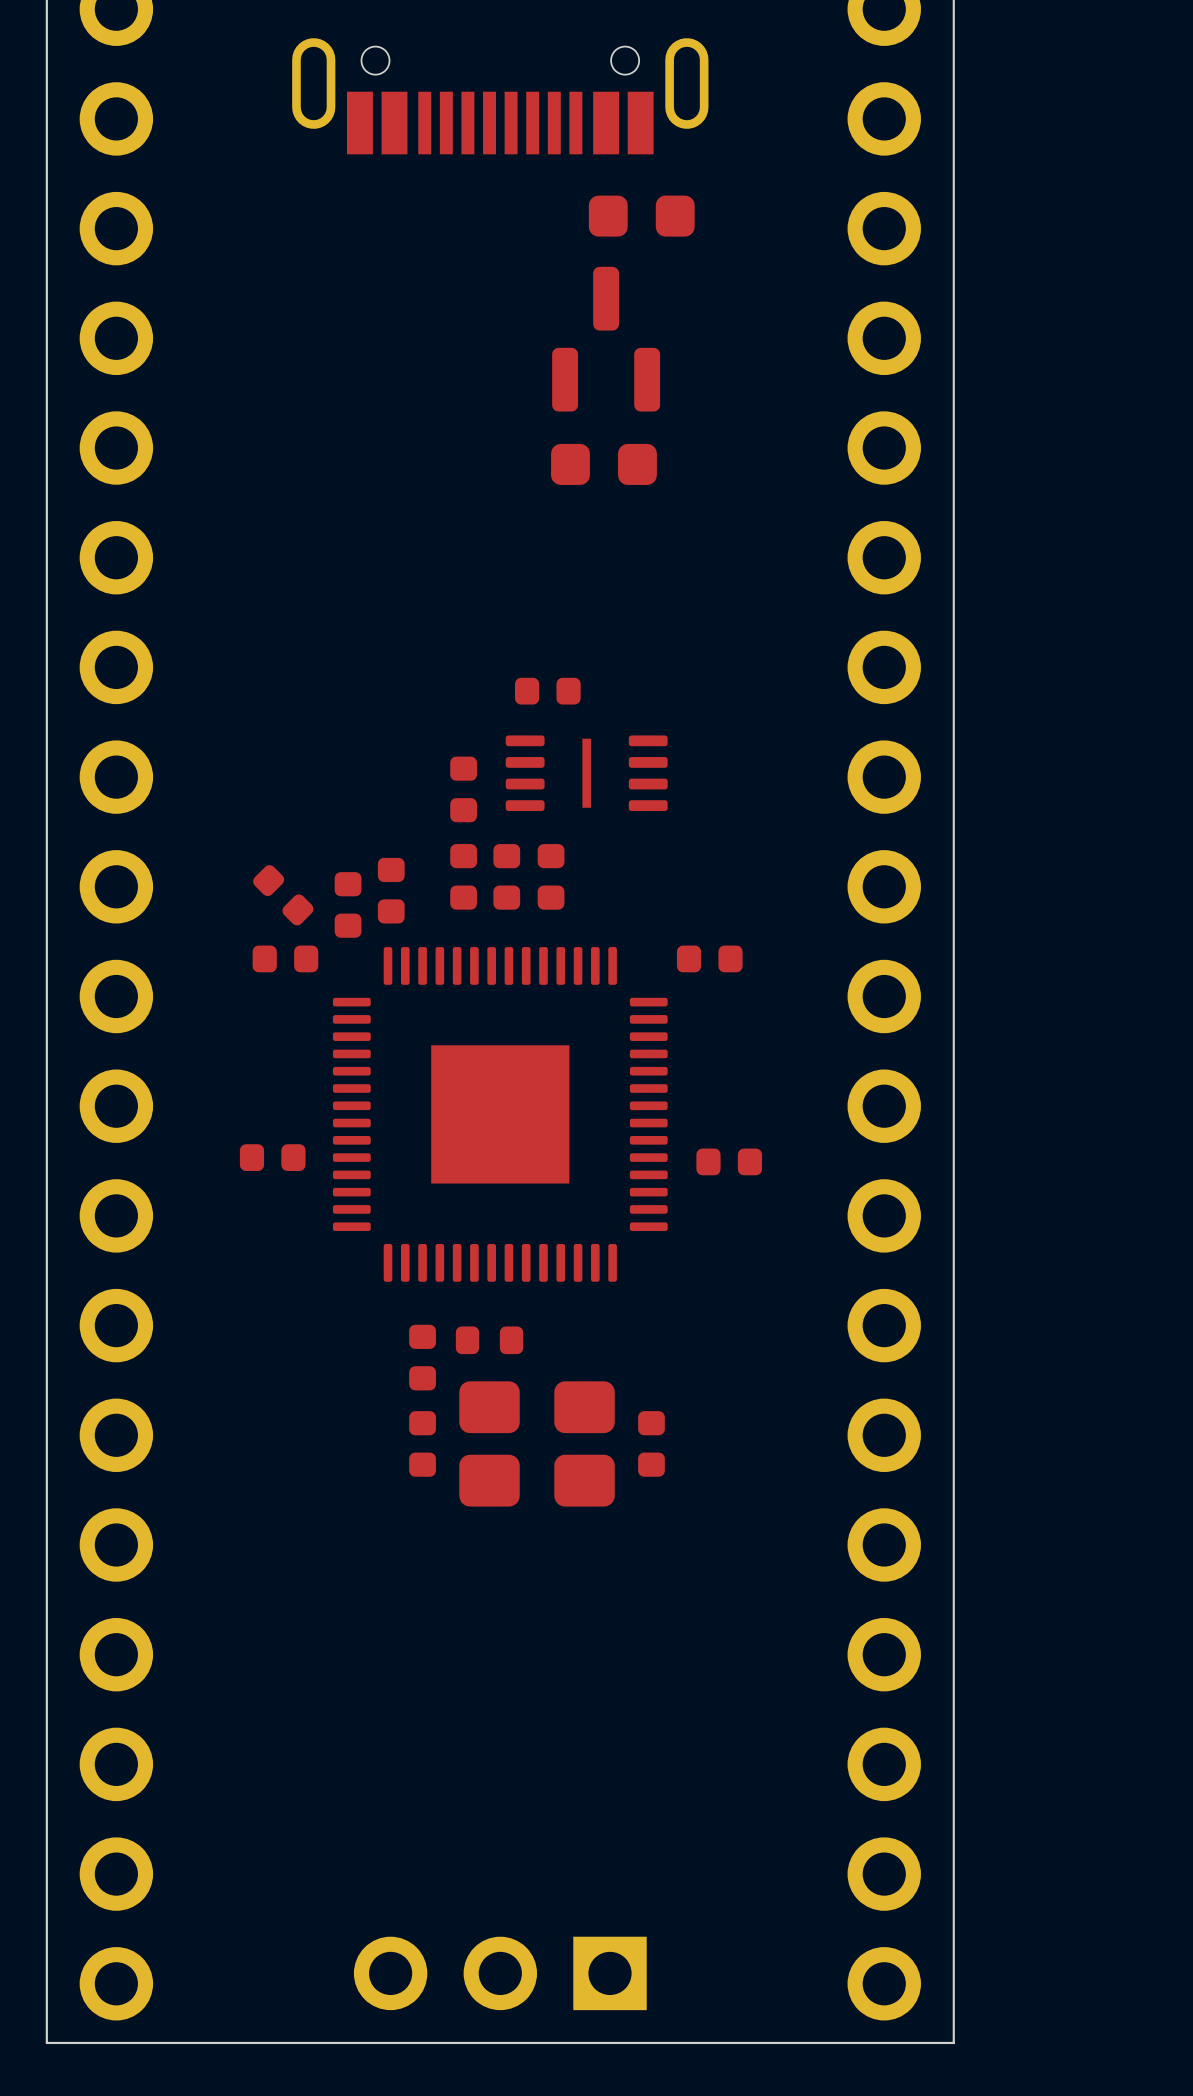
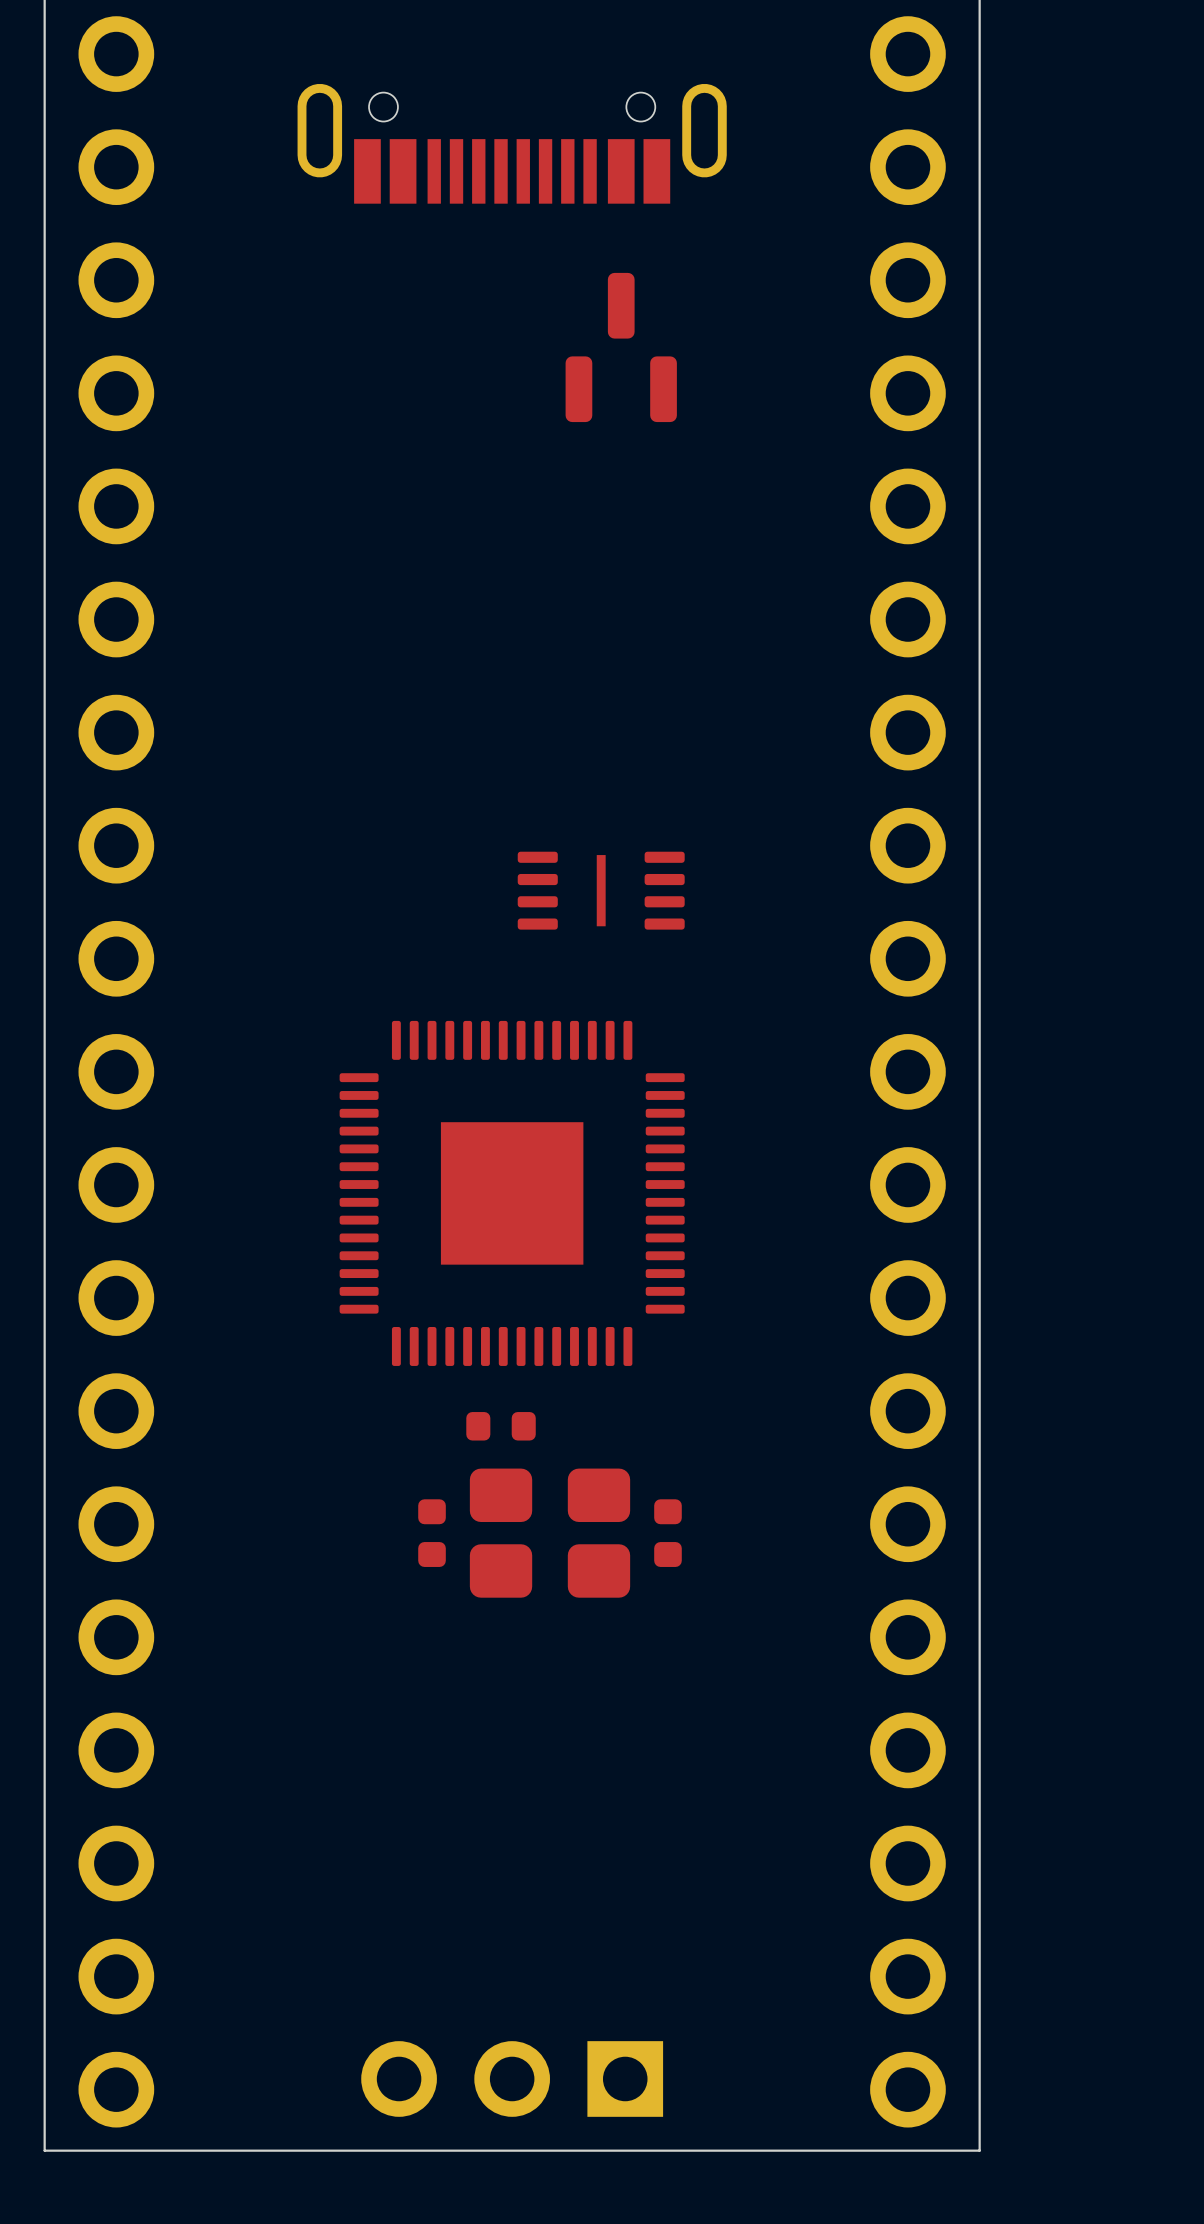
part: (641, 216) -> none
part position: (606, 339) -> (621, 347)
part: (603, 464) -> none
part: (547, 691) -> none
part position: (586, 773) -> (601, 890)
part: (463, 789) -> none
part: (463, 876) -> none
part: (506, 876) -> none
part: (551, 876) -> none
part: (391, 890) -> none
part: (283, 895) -> none
part: (348, 904) -> none
part: (285, 958) -> none
part: (709, 958) -> none
part: (272, 1157) -> none
part: (729, 1161) -> none
part: (422, 1357) -> none

